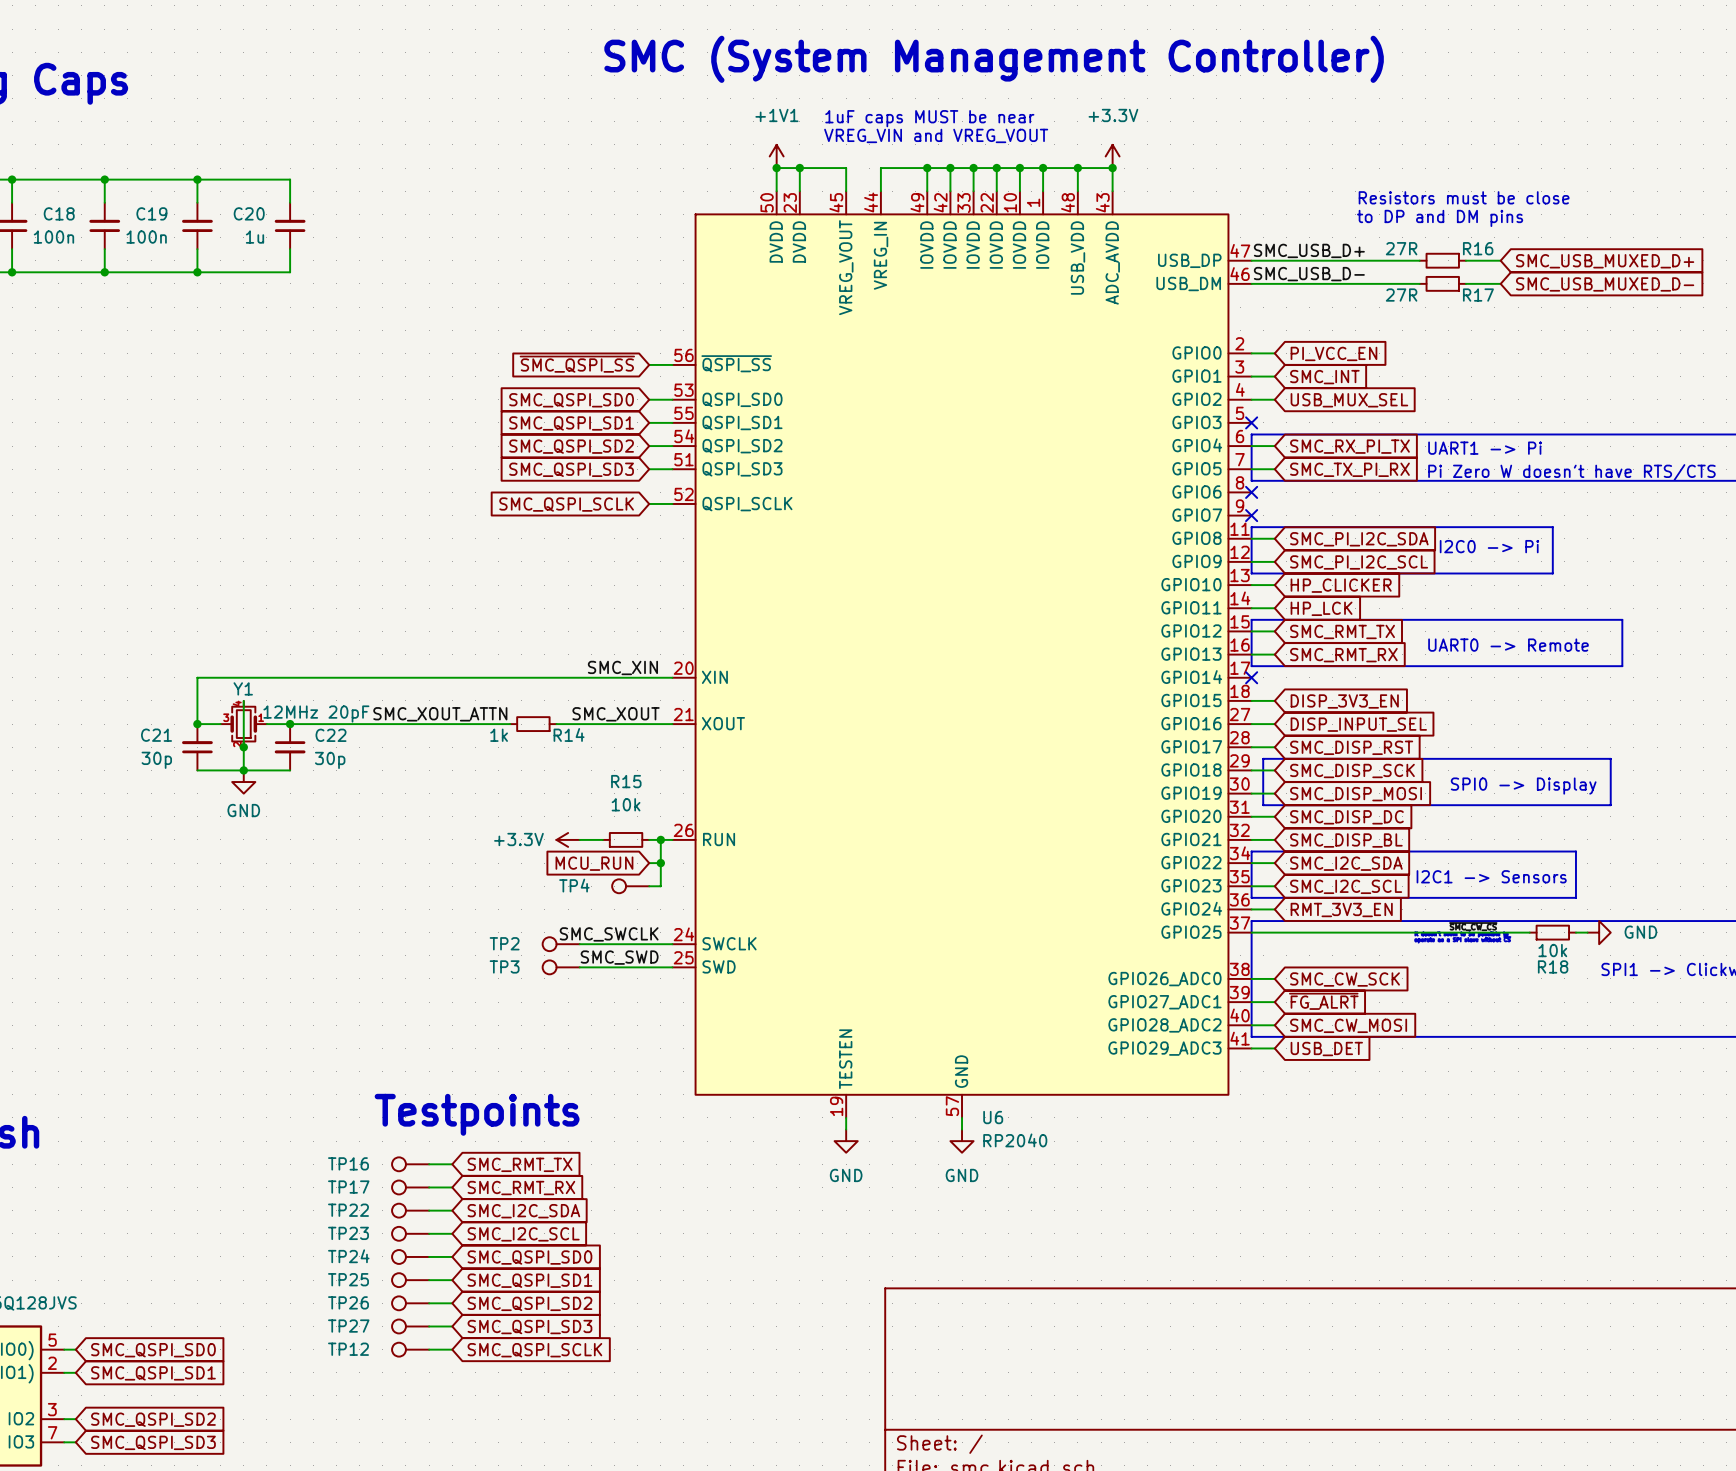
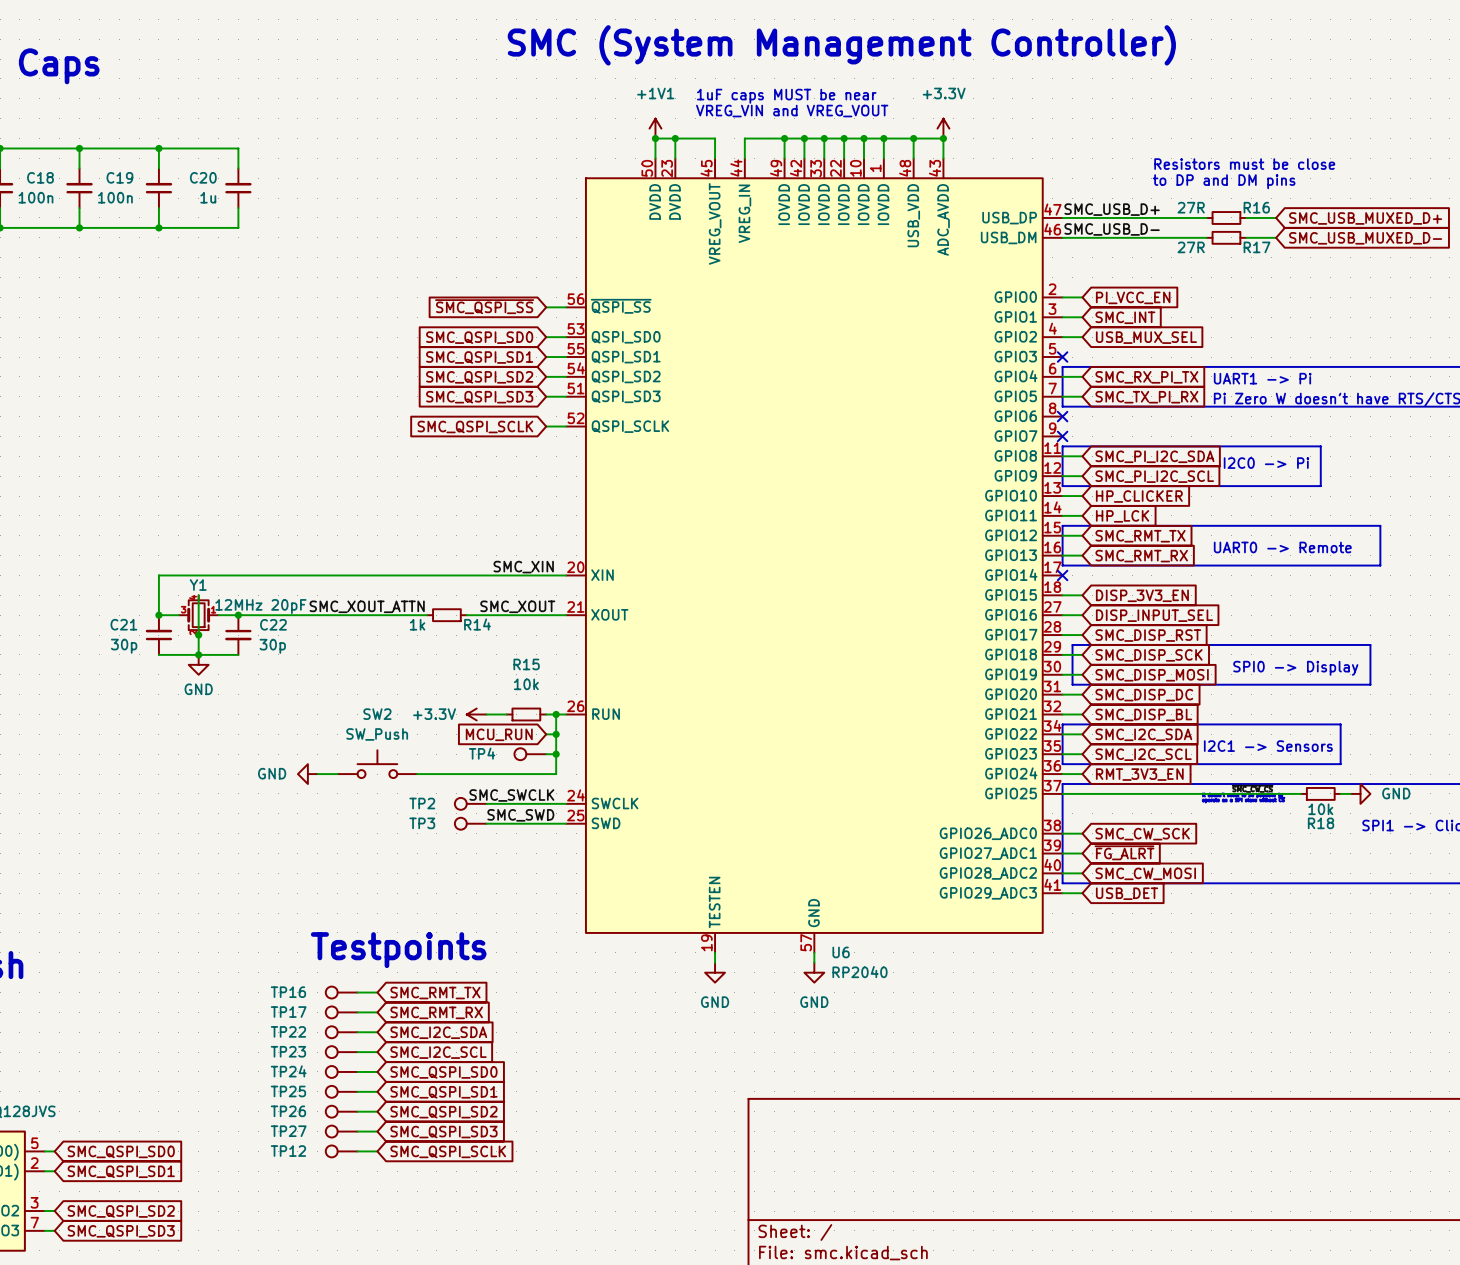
wire: none -> (556, 754) (556, 774) (417, 774)
junction: none -> (556, 754)
SW2: none -> SW_Push (377, 764)
power symbol: none -> GND (307, 774)
wire: none -> (317, 774) (337, 774)

